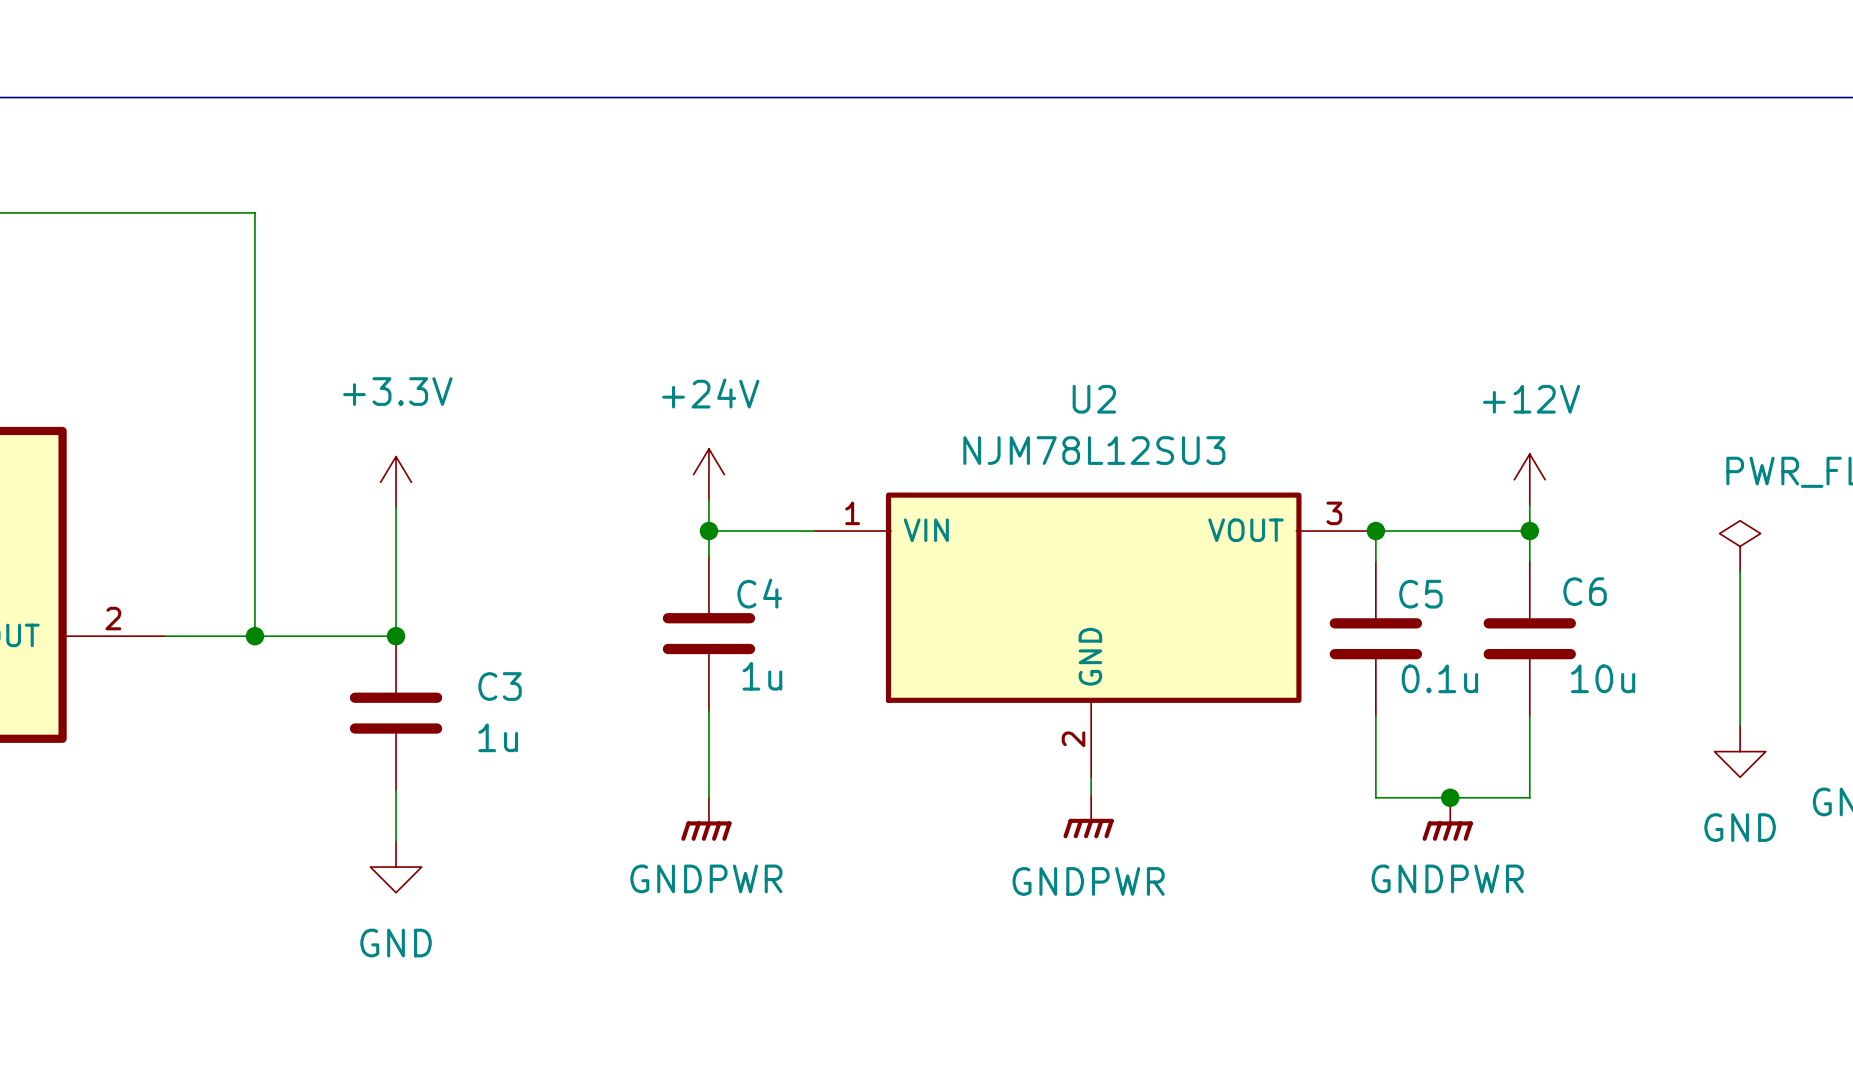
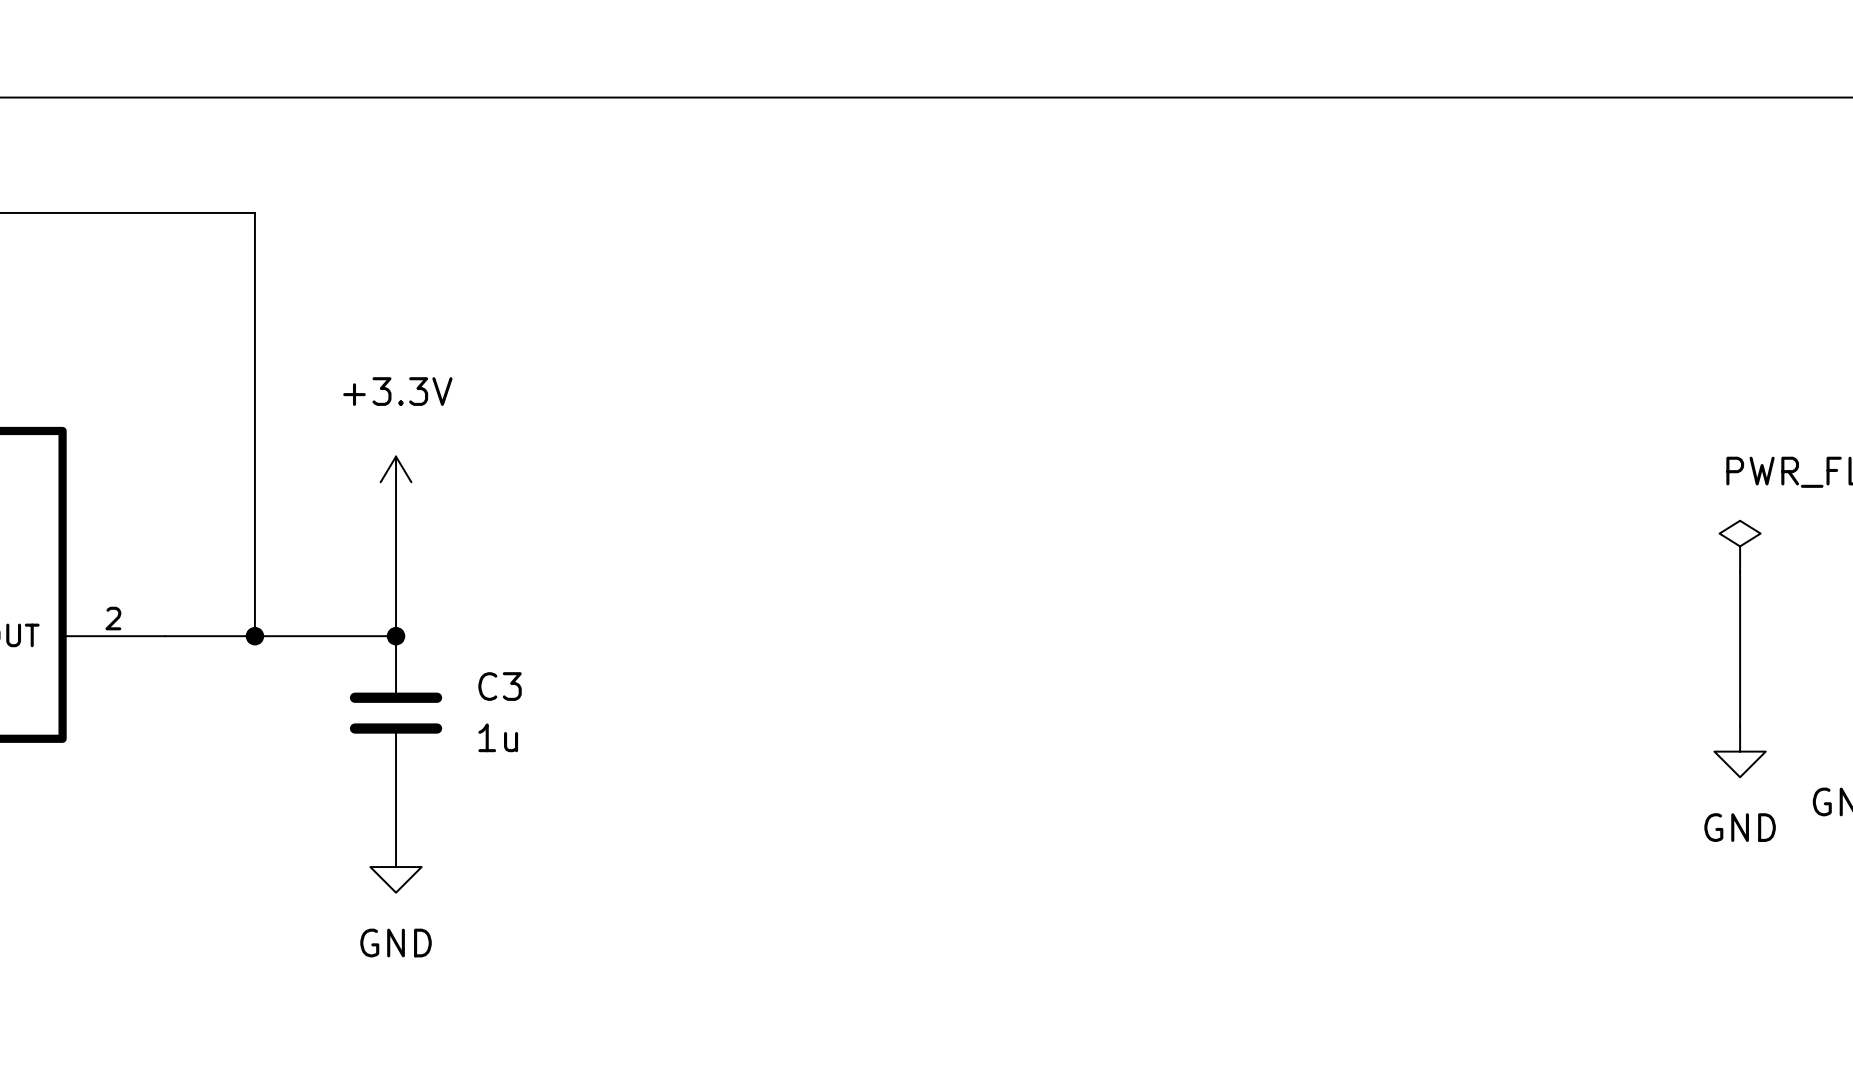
power symbol: +24V (708, 474) -> none
power symbol: +12V (1529, 479) -> none
wire: (708, 500) (708, 556) -> none
wire: (1529, 505) (1529, 561) -> none
wire: (708, 531) (814, 531) -> none
junction: (708, 531) -> none
wire: (1373, 531) (1529, 531) -> none
wire: (1375, 531) (1375, 561) -> none
junction: (1375, 531) -> none
junction: (1529, 531) -> none
C4: 1u (708, 633) -> none
U2: NJM78L12SU3 (1093, 634) -> none
C5: 0.1u (1375, 638) -> none
C6: 10u (1529, 638) -> none
wire: (708, 710) (708, 797) -> none
wire: (1375, 715) (1375, 797) (1529, 797) (1529, 715) -> none
wire: (1091, 777) (1091, 795) -> none
junction: (1450, 797) -> none
power symbol: GNDPWR (1088, 816) -> none
power symbol: GNDPWR (706, 819) -> none
power symbol: GNDPWR (1447, 819) -> none

